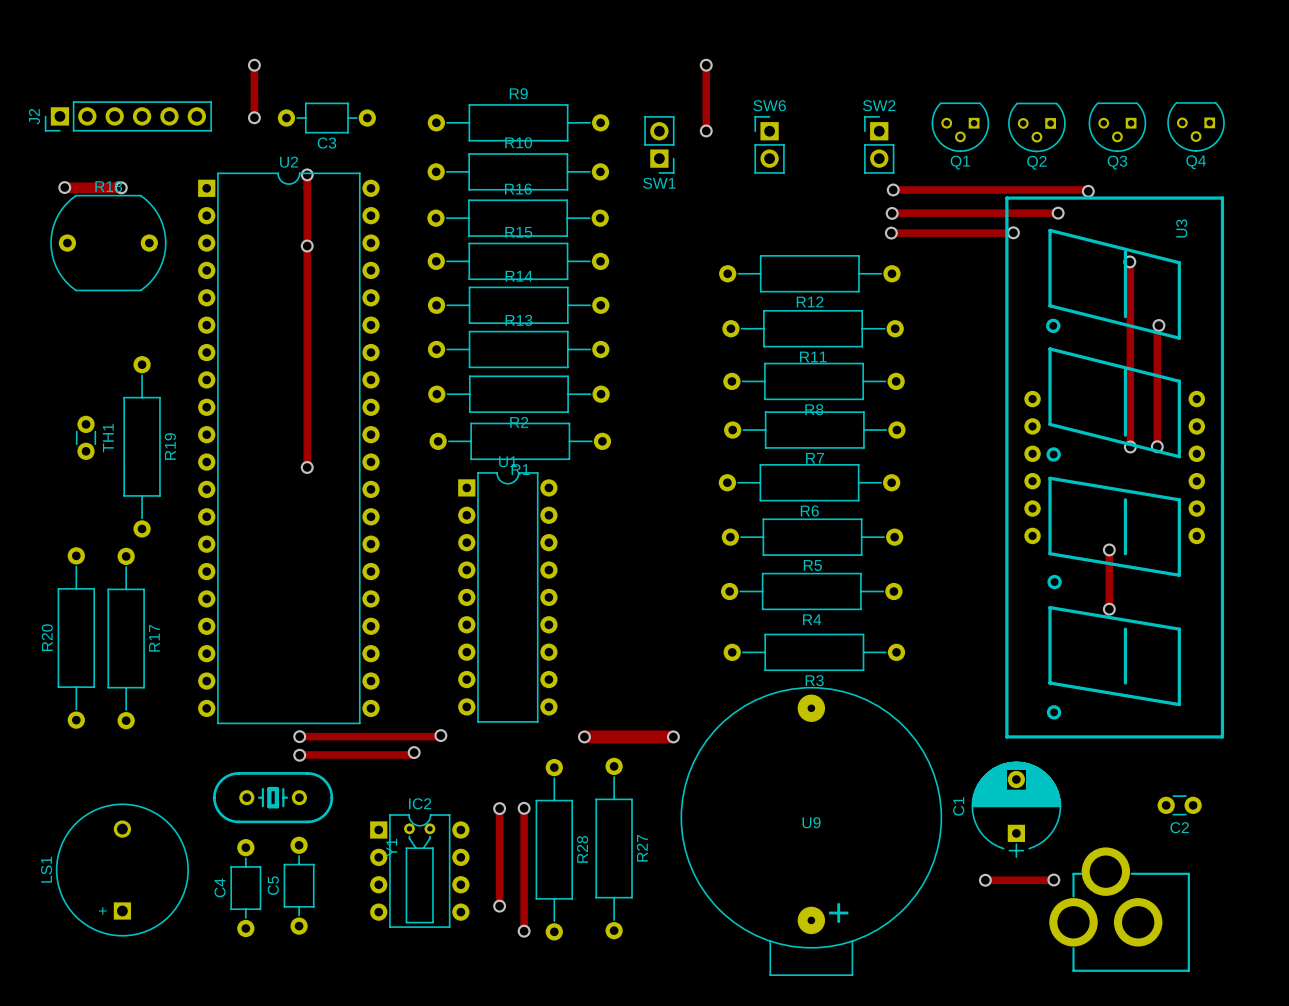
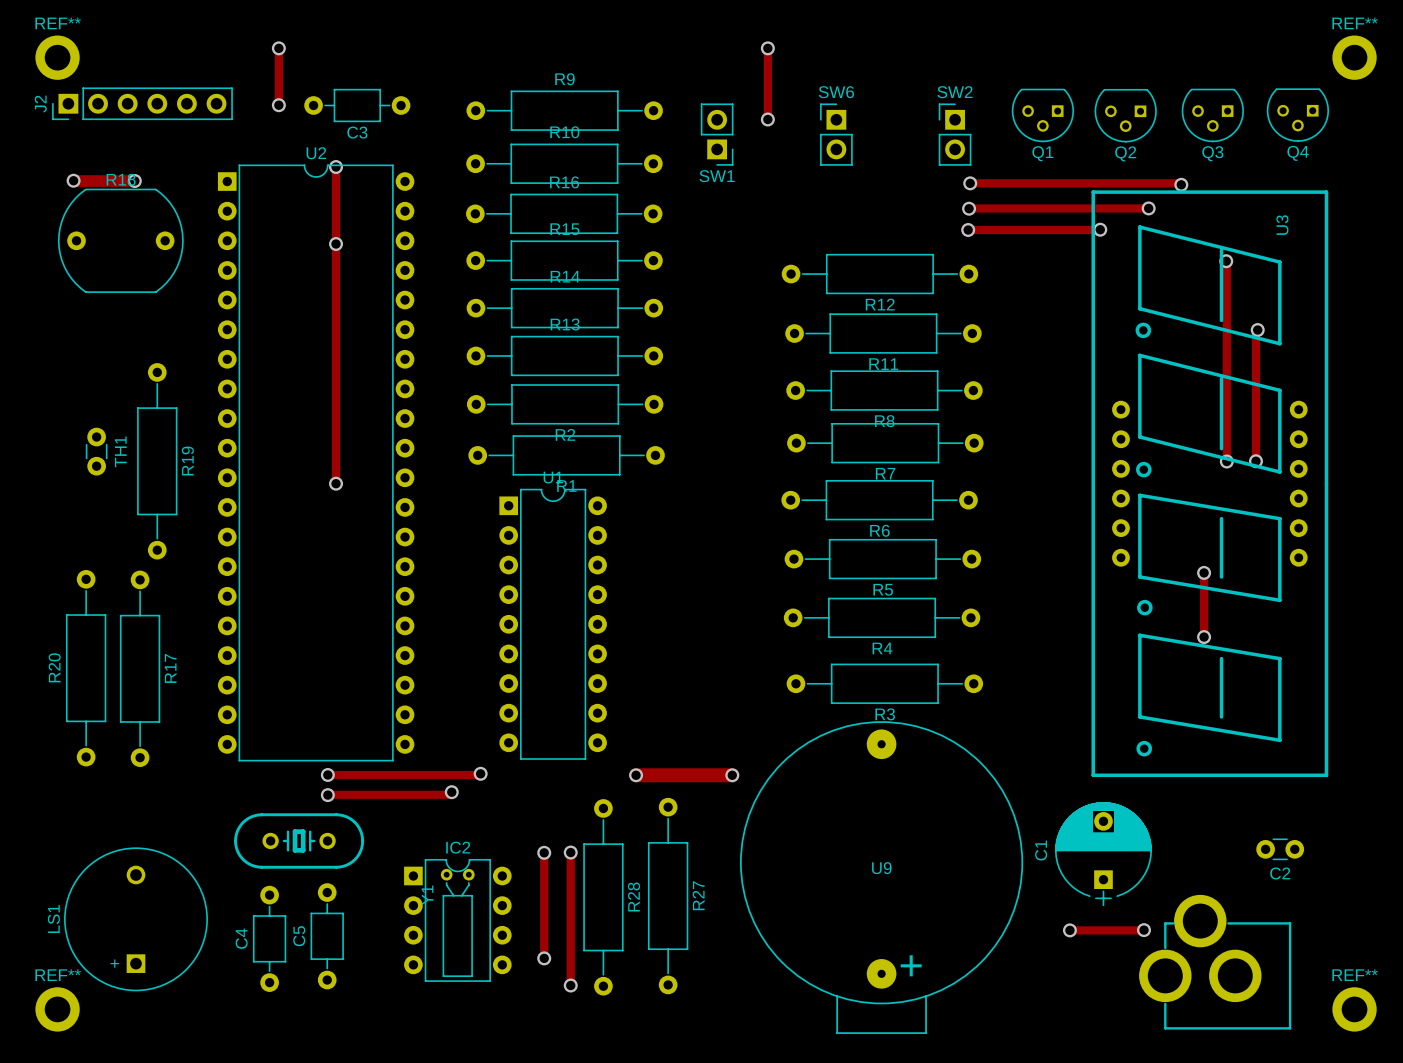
REF**: none -> (57, 57)
REF**: none -> (1354, 57)
REF**: none -> (57, 1009)
REF**: none -> (1354, 1009)

